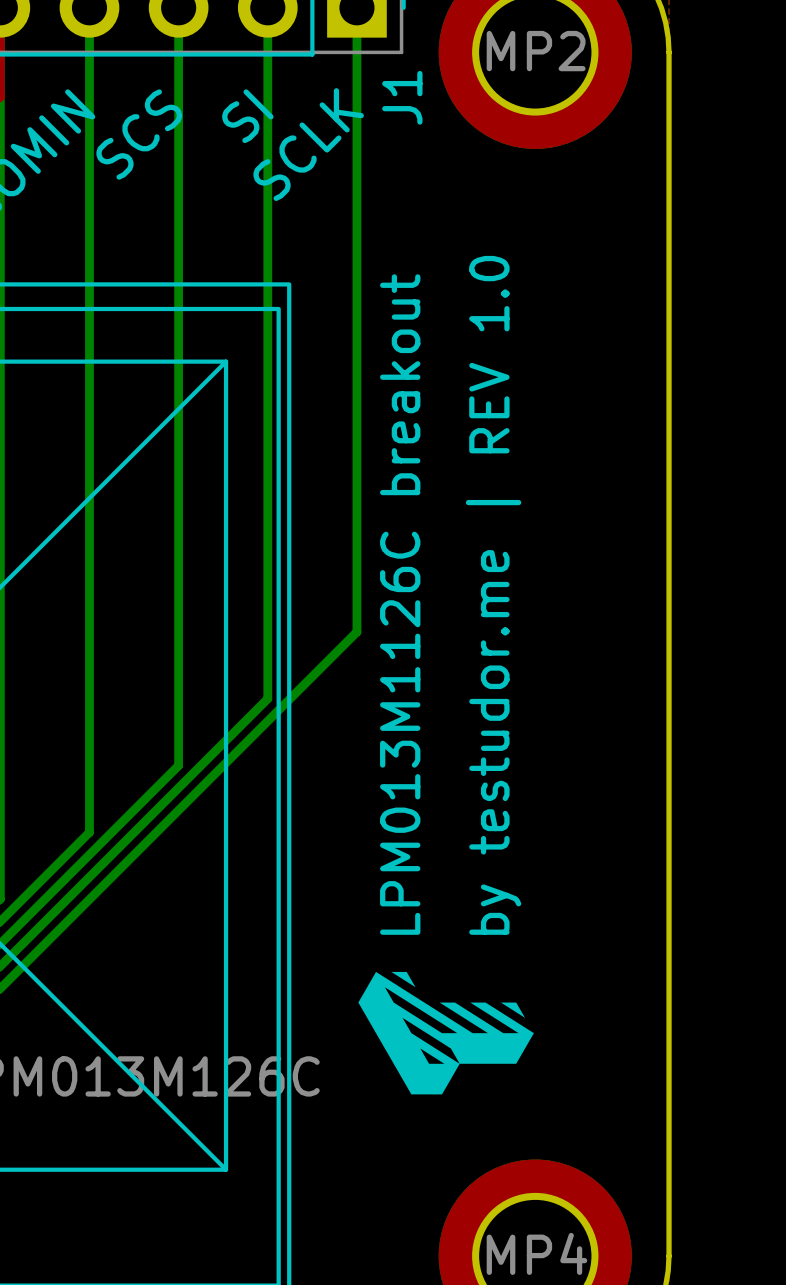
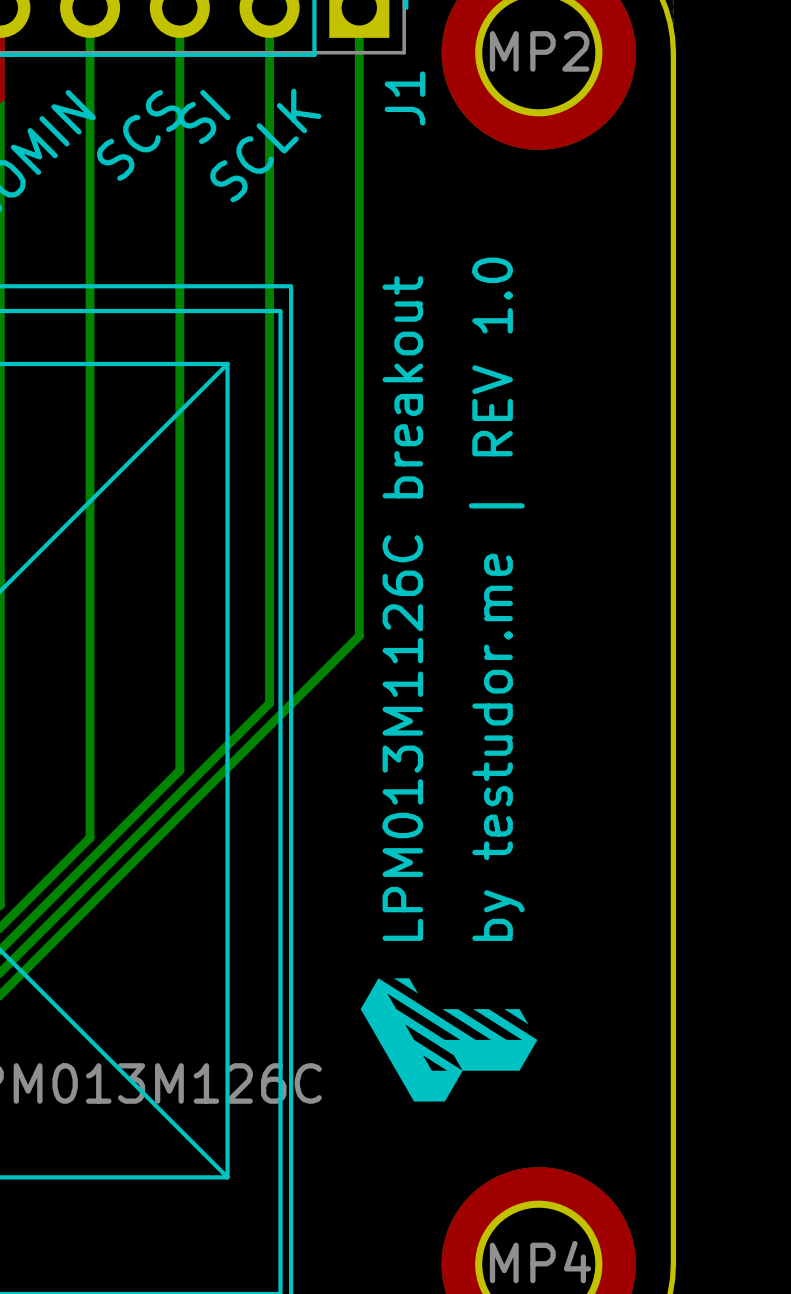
text position: SI (247, 116) -> SI (204, 116)
text position: SCLK (308, 144) -> SCLK (265, 145)

